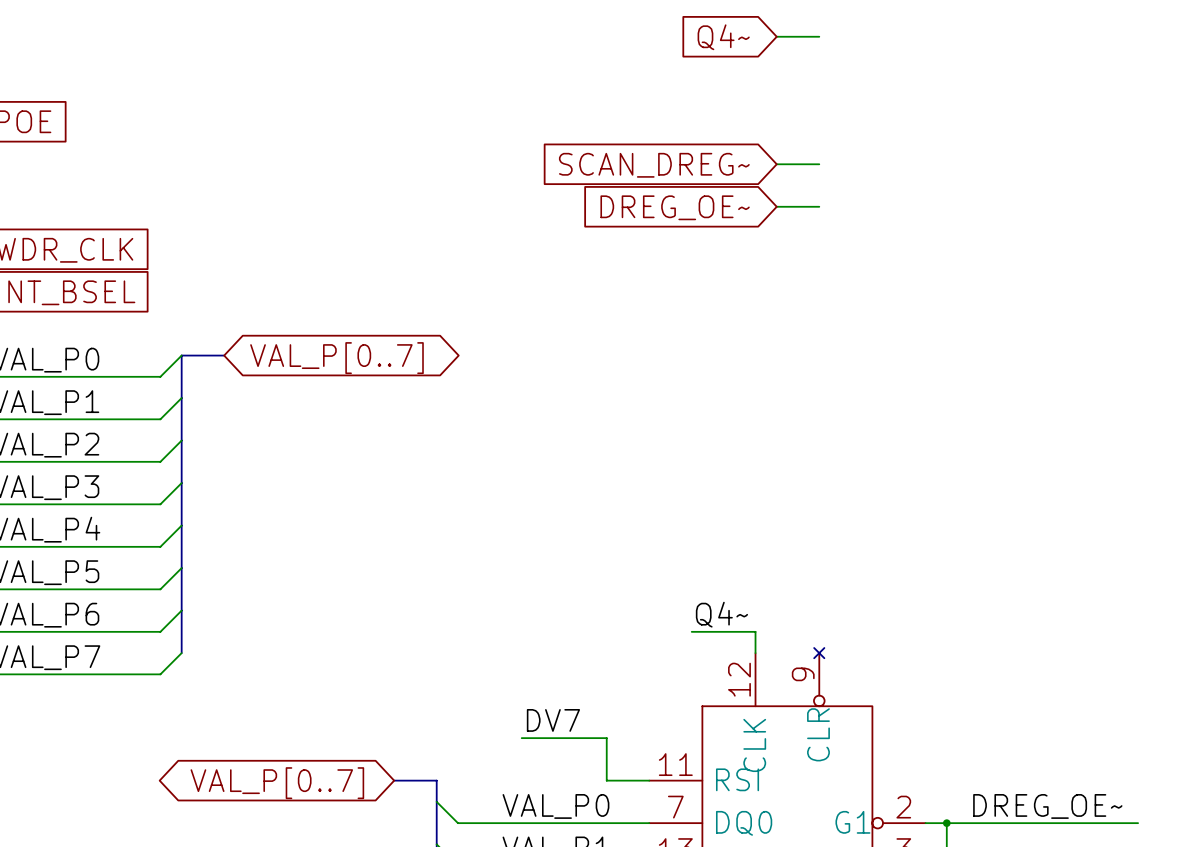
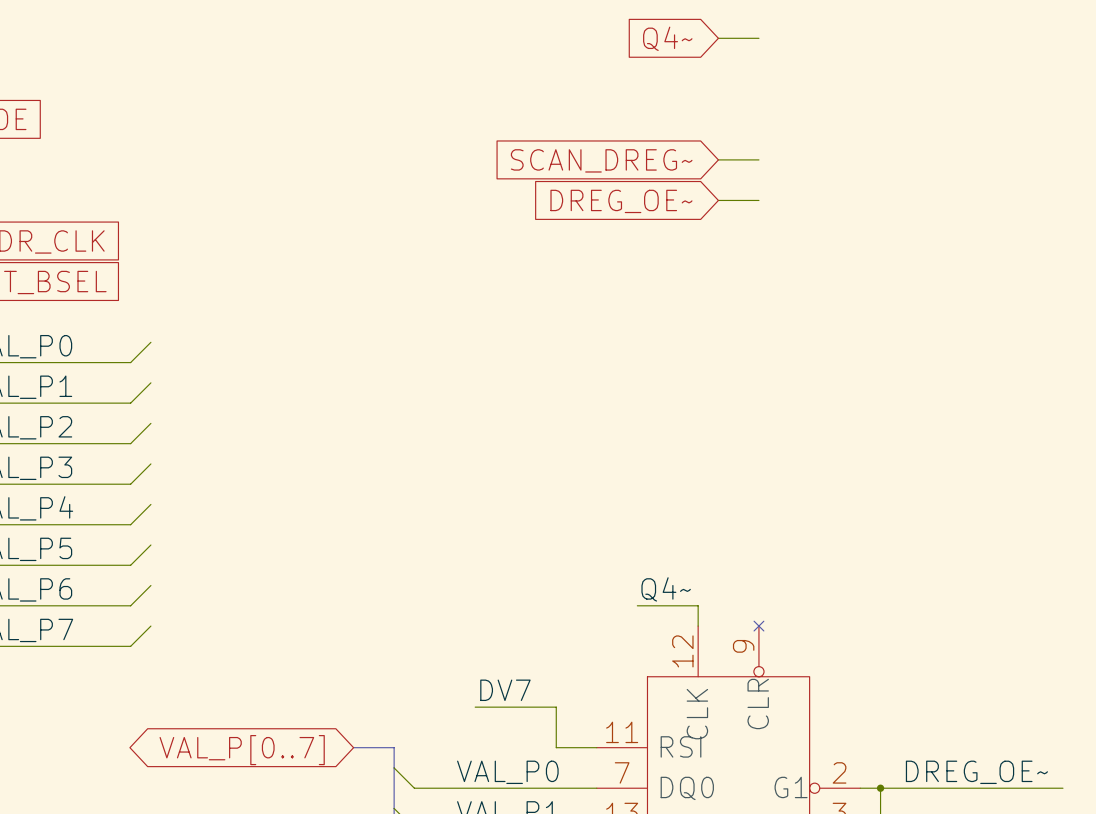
bus: (224, 355) (181, 355) (181, 653) -> none
global label: VAL_P[0..7] (336, 358) -> none

